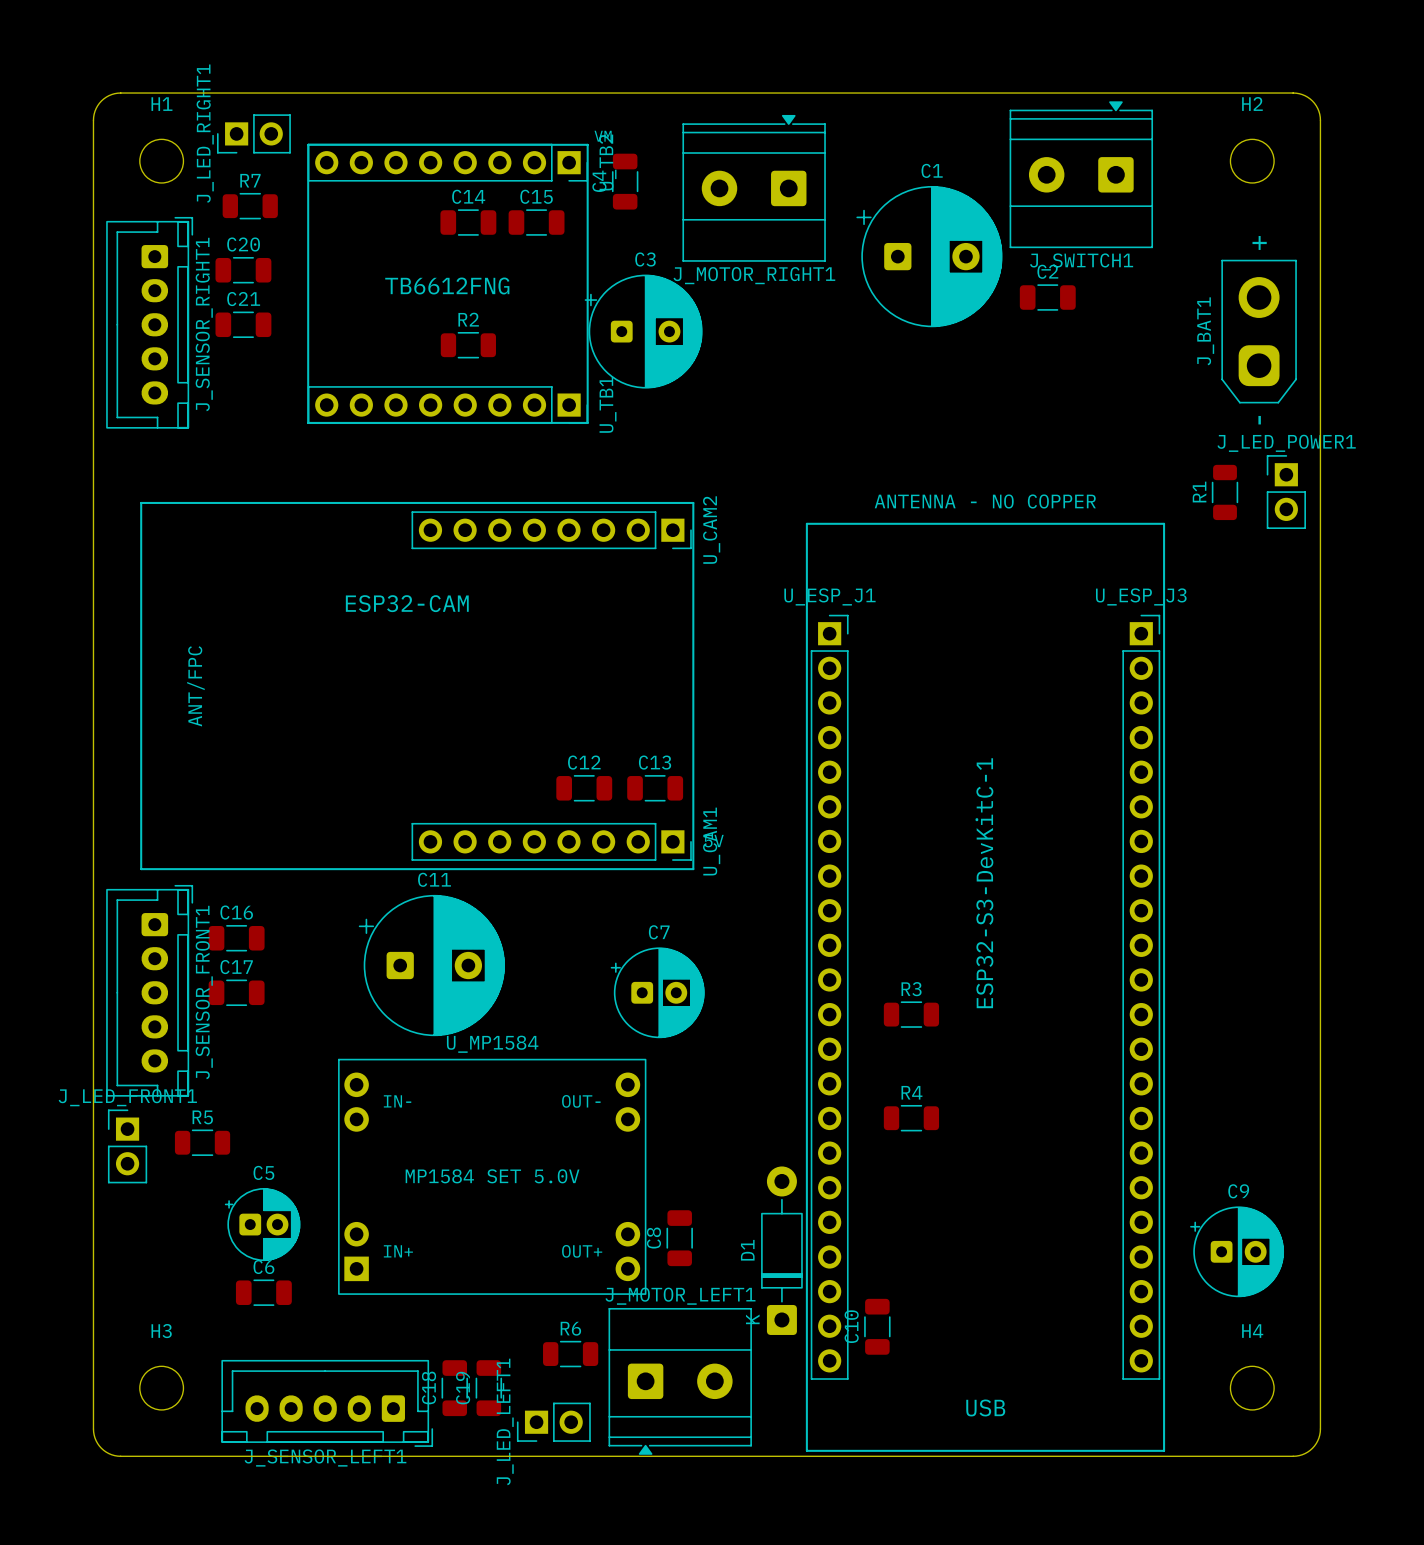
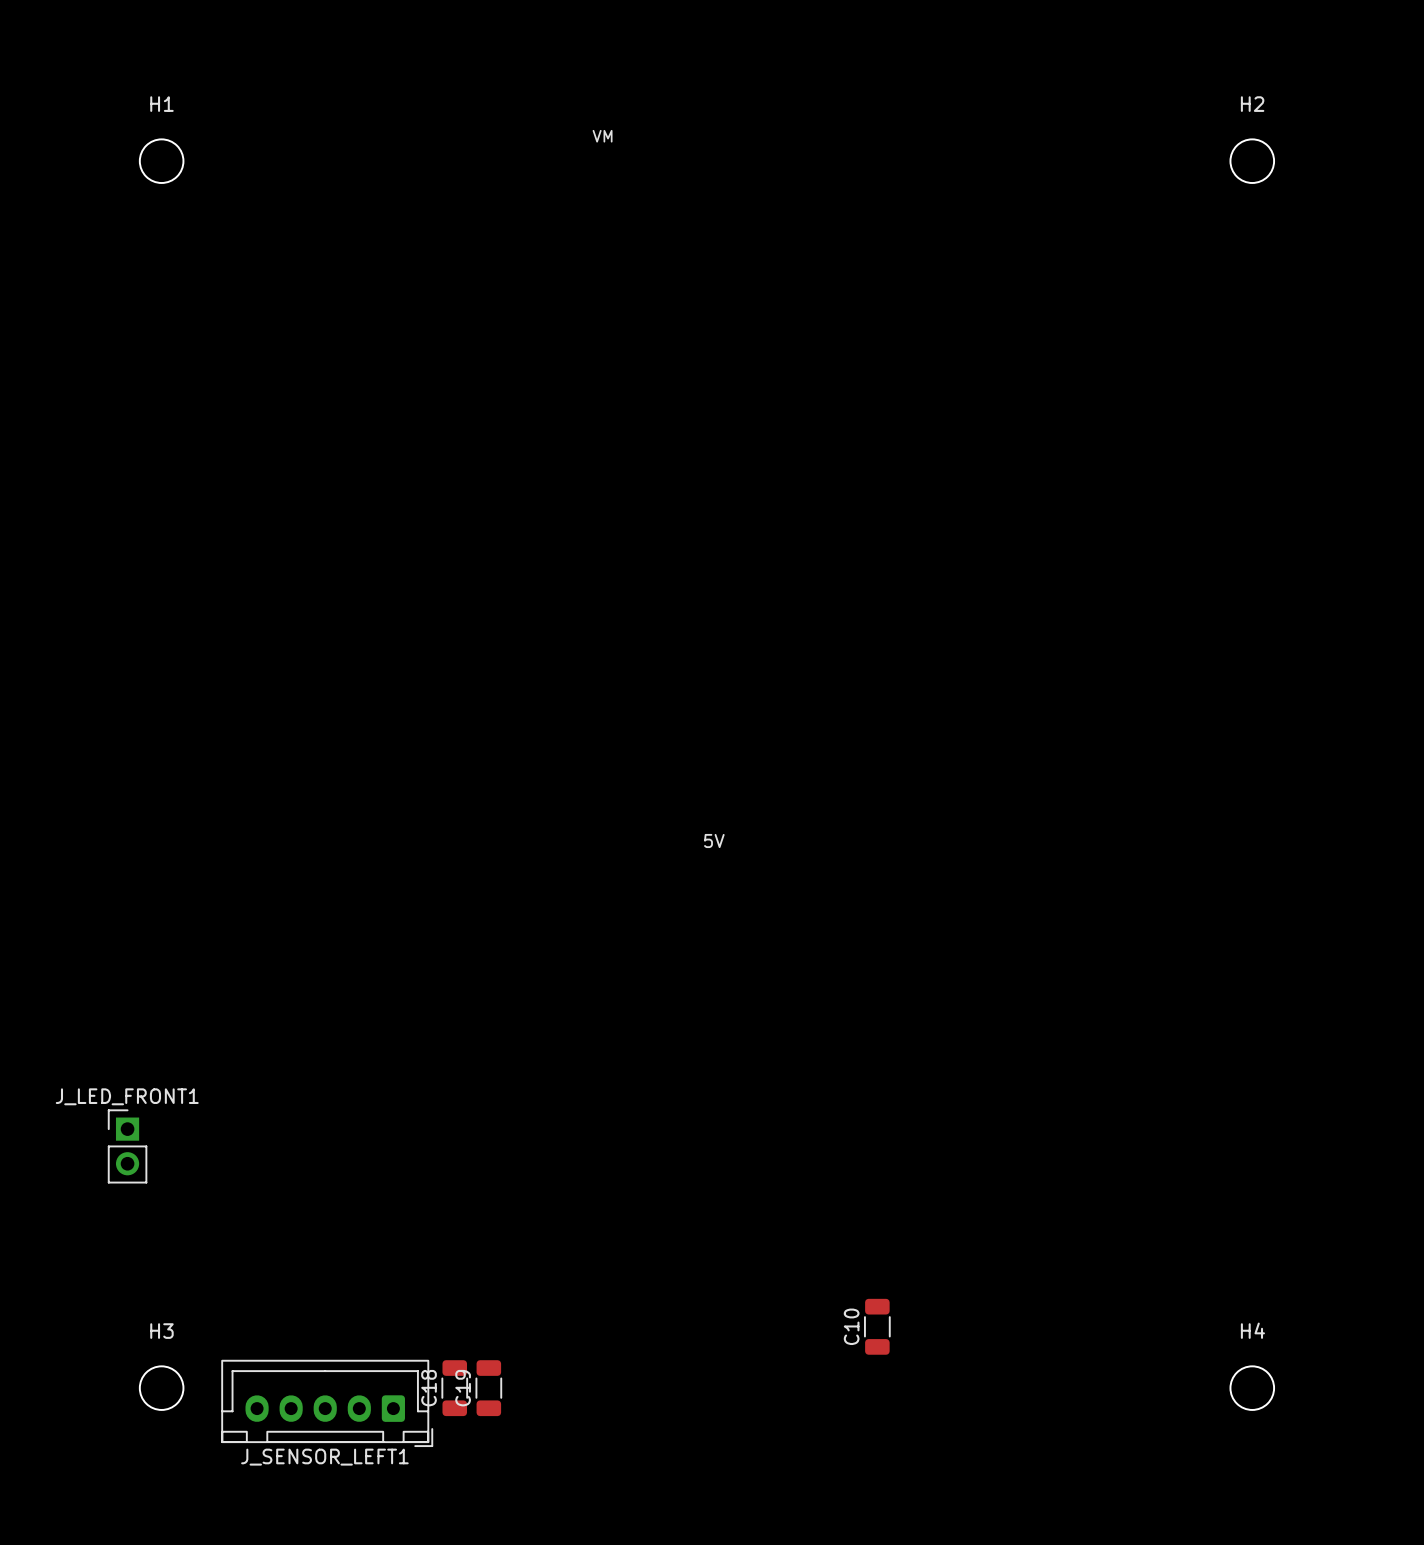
board edge: (120, 93) (1293, 93) (1305, 95) (1314, 103) (1318, 111) (1320, 120) (1320, 1429) (1317, 1440) (1310, 1450) (1302, 1454) (1293, 1456) (120, 1456) (108, 1453) (99, 1446) (95, 1438) (93, 1429) (93, 120) (96, 108) (101, 101) (108, 95) (120, 93) -> none
J_LED_RIGHT1: (253, 133) -> none
line: (308, 144) (587, 144) (587, 422) (308, 422) (308, 144) -> none
U_TB2: (447, 162) -> none
J_SWITCH1: (1081, 174) -> none
C4: (625, 181) -> none
J_MOTOR_RIGHT1: (754, 188) -> none
R7: (250, 206) -> none
C14: (468, 222) -> none
C15: (536, 222) -> none
C1: (929, 256) -> none
C20: (243, 270) -> none
text: TB6612FNG (447, 285) -> none
C2: (1047, 297) -> none
J_SENSOR_RIGHT1: (149, 322) -> none
C21: (243, 324) -> none
C3: (643, 331) -> none
J_BAT1: (1259, 331) -> none
R2: (468, 345) -> none
U_TB1: (447, 405) -> none
R1: (1225, 492) -> none
J_LED_POWER1: (1286, 492) -> none
text: ANTENNA - NO COPPER (985, 501) -> none
line: (141, 502) (693, 502) (693, 869) (141, 869) (141, 502) -> none
line: (806, 523) (1164, 523) (1164, 1450) (806, 1450) (806, 523) -> none
U_CAM2: (551, 530) -> none
text: ESP32-CAM (407, 603) -> none
text: ANT/FPC (195, 686) -> none
C12: (584, 788) -> none
C13: (655, 788) -> none
U_CAM1: (551, 841) -> none
text: ESP32-S3-DevKitC-1 (984, 883) -> none
C16: (236, 938) -> none
C11: (431, 965) -> none
J_SENSOR_FRONT1: (149, 990) -> none
C17: (236, 992) -> none
C7: (657, 992) -> none
U_ESP_J1: (829, 997) -> none
U_ESP_J3: (1141, 997) -> none
R3: (911, 1014) -> none
R4: (911, 1118) -> none
R5: (202, 1142) -> none
U_MP1584: (492, 1176) -> none
C5: (262, 1224) -> none
C8: (679, 1238) -> none
D1: (781, 1250) -> none
C9: (1237, 1251) -> none
C6: (263, 1292) -> none
R6: (570, 1354) -> none
J_MOTOR_LEFT1: (680, 1381) -> none
text: USB (985, 1407) -> none
J_LED_LEFT1: (553, 1422) -> none

